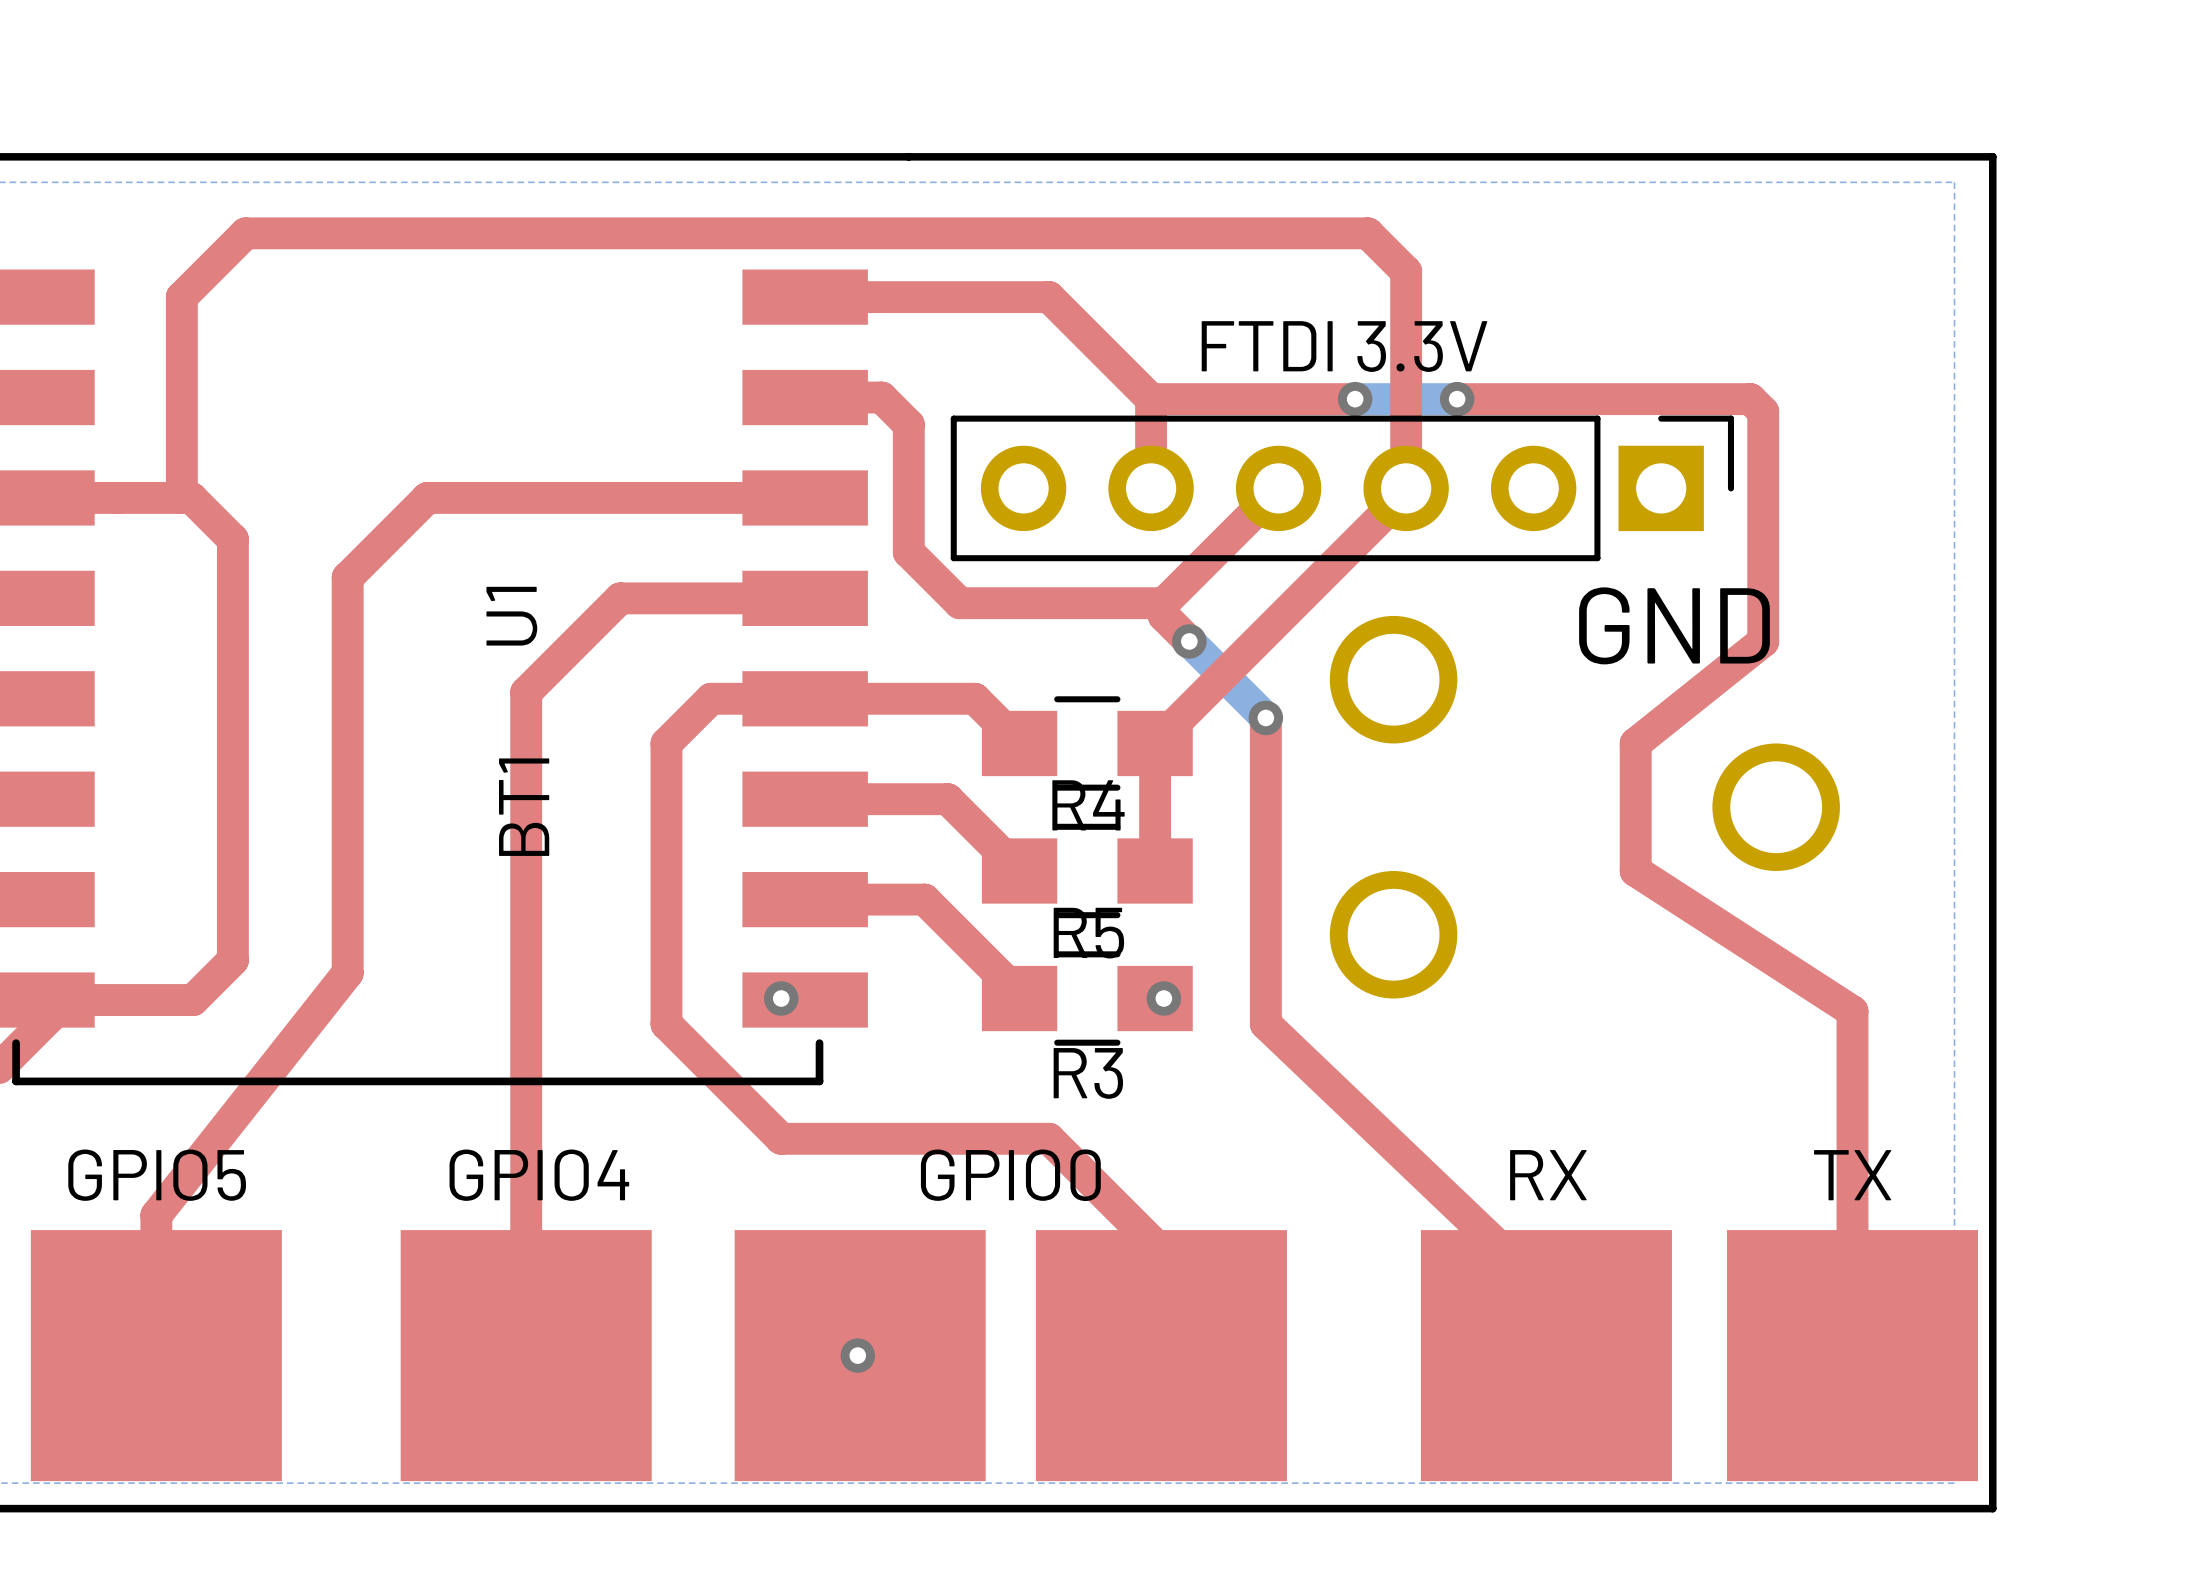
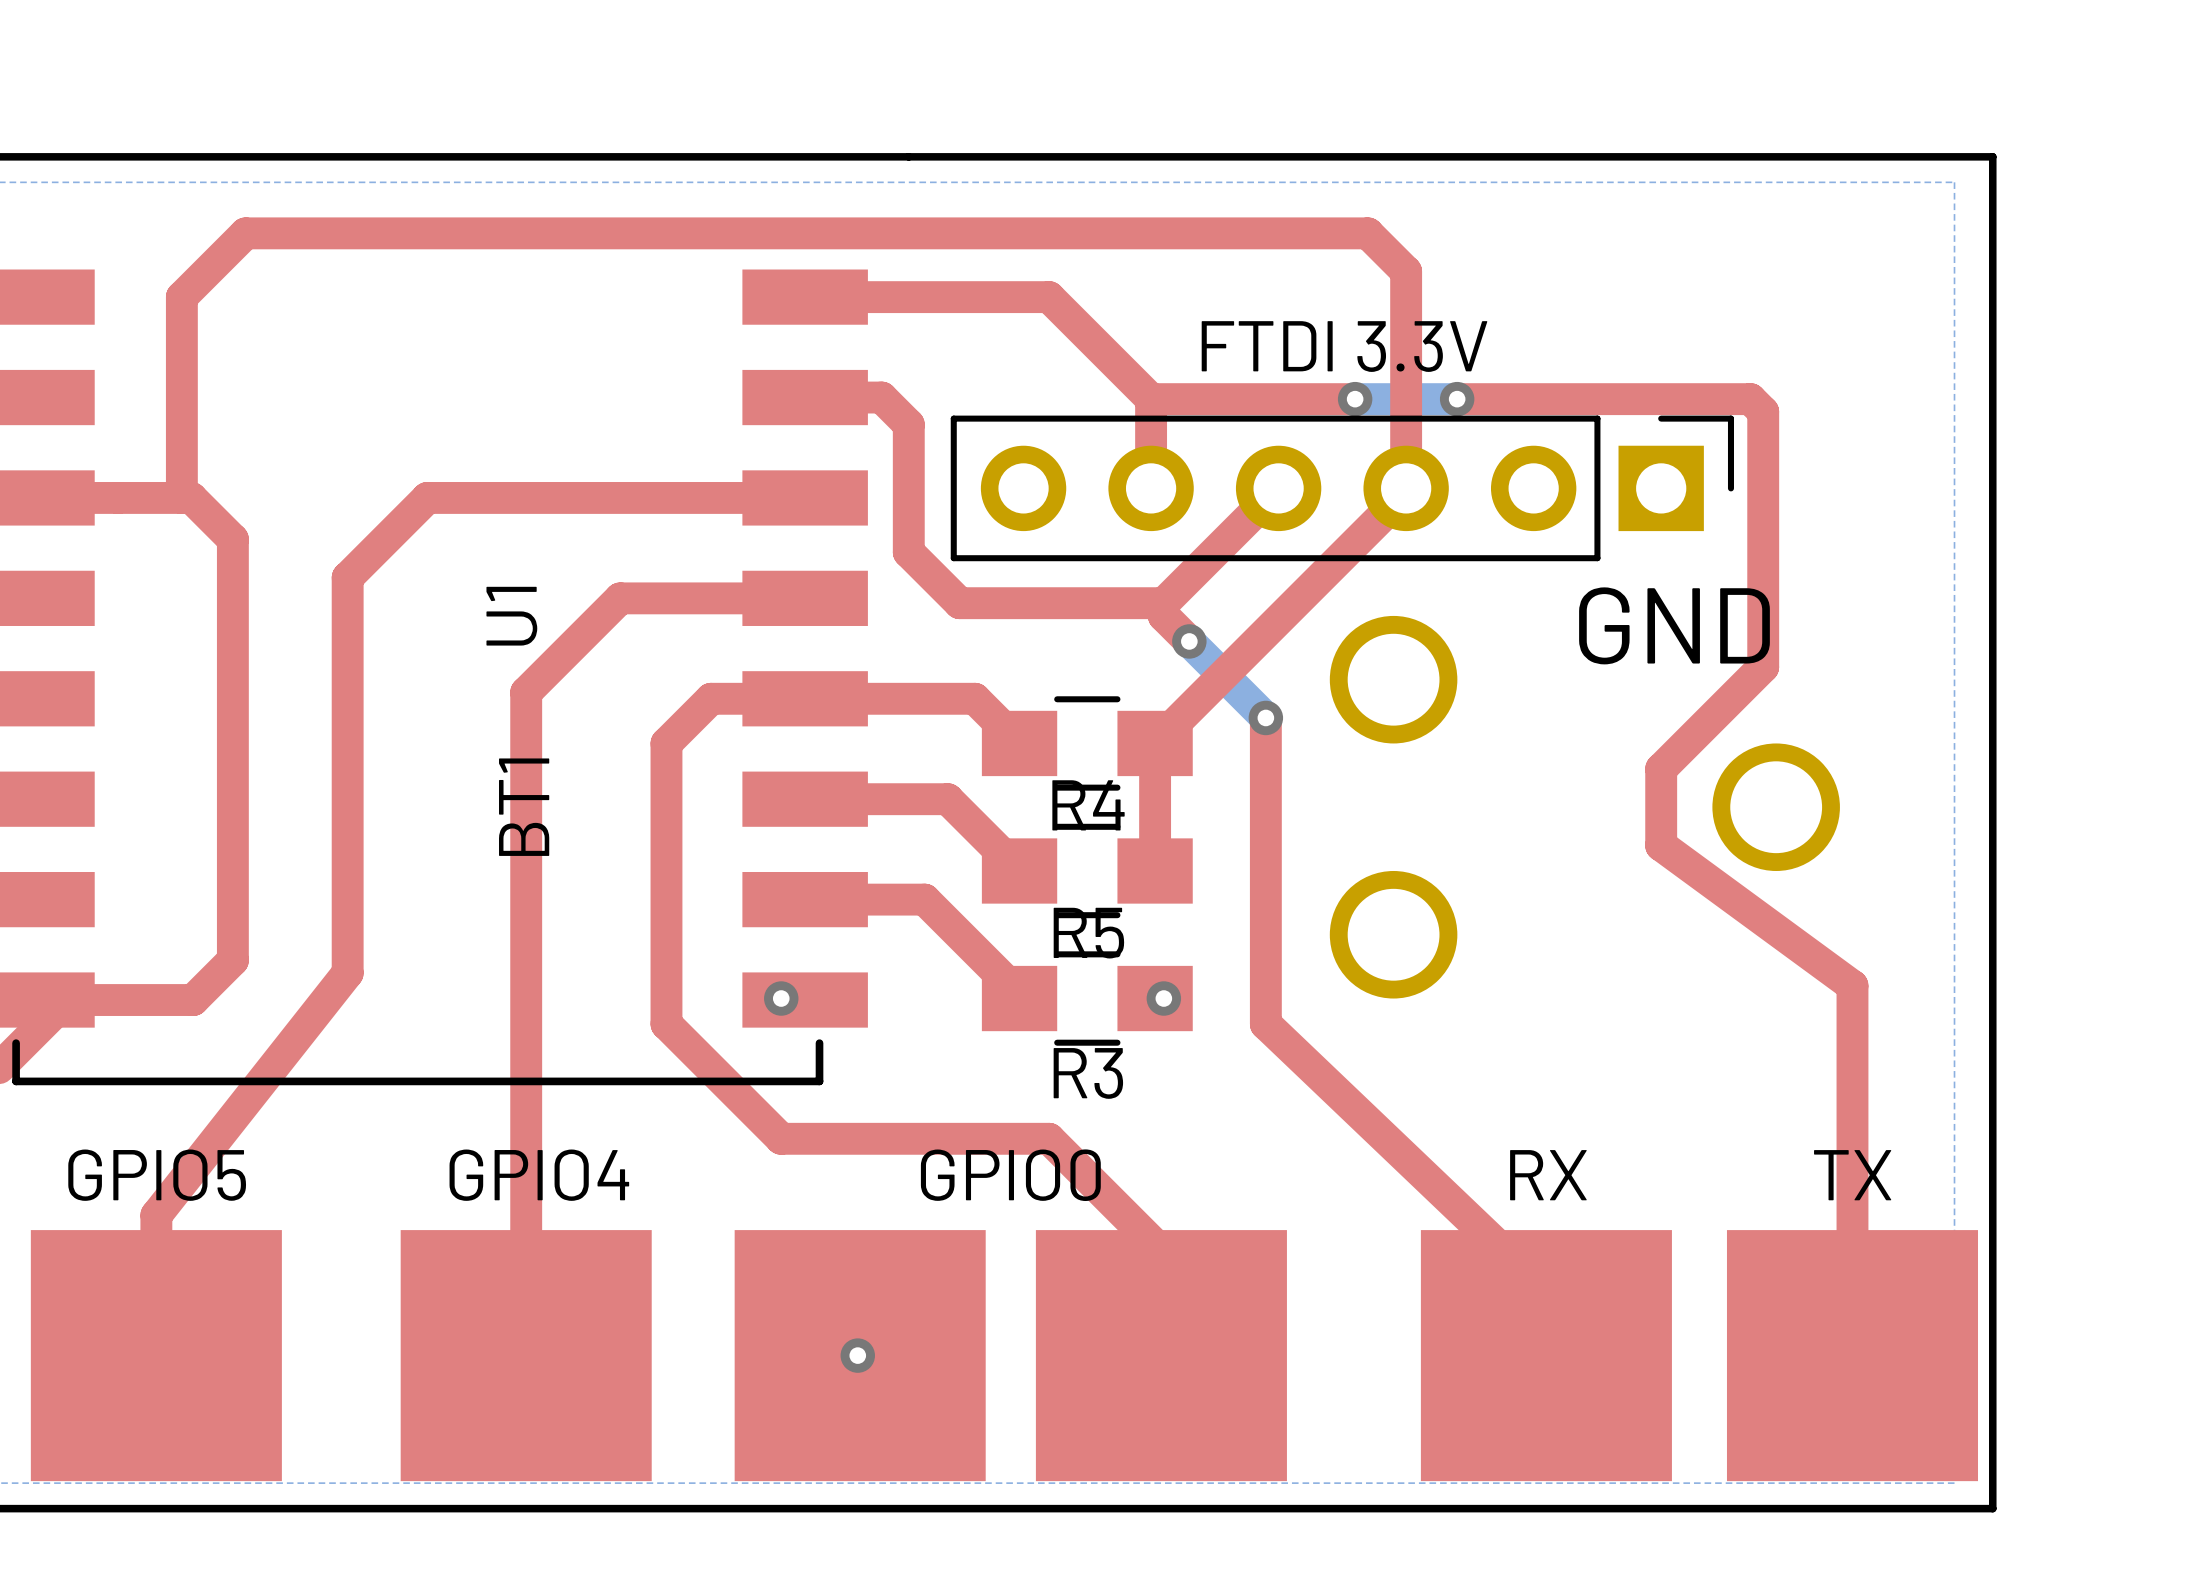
top track: (1763, 641) (1635, 743) (1635, 870) (1852, 1011) -> (1763, 641) (1763, 666) (1661, 768) (1661, 845) (1852, 985) (1852, 1011)

